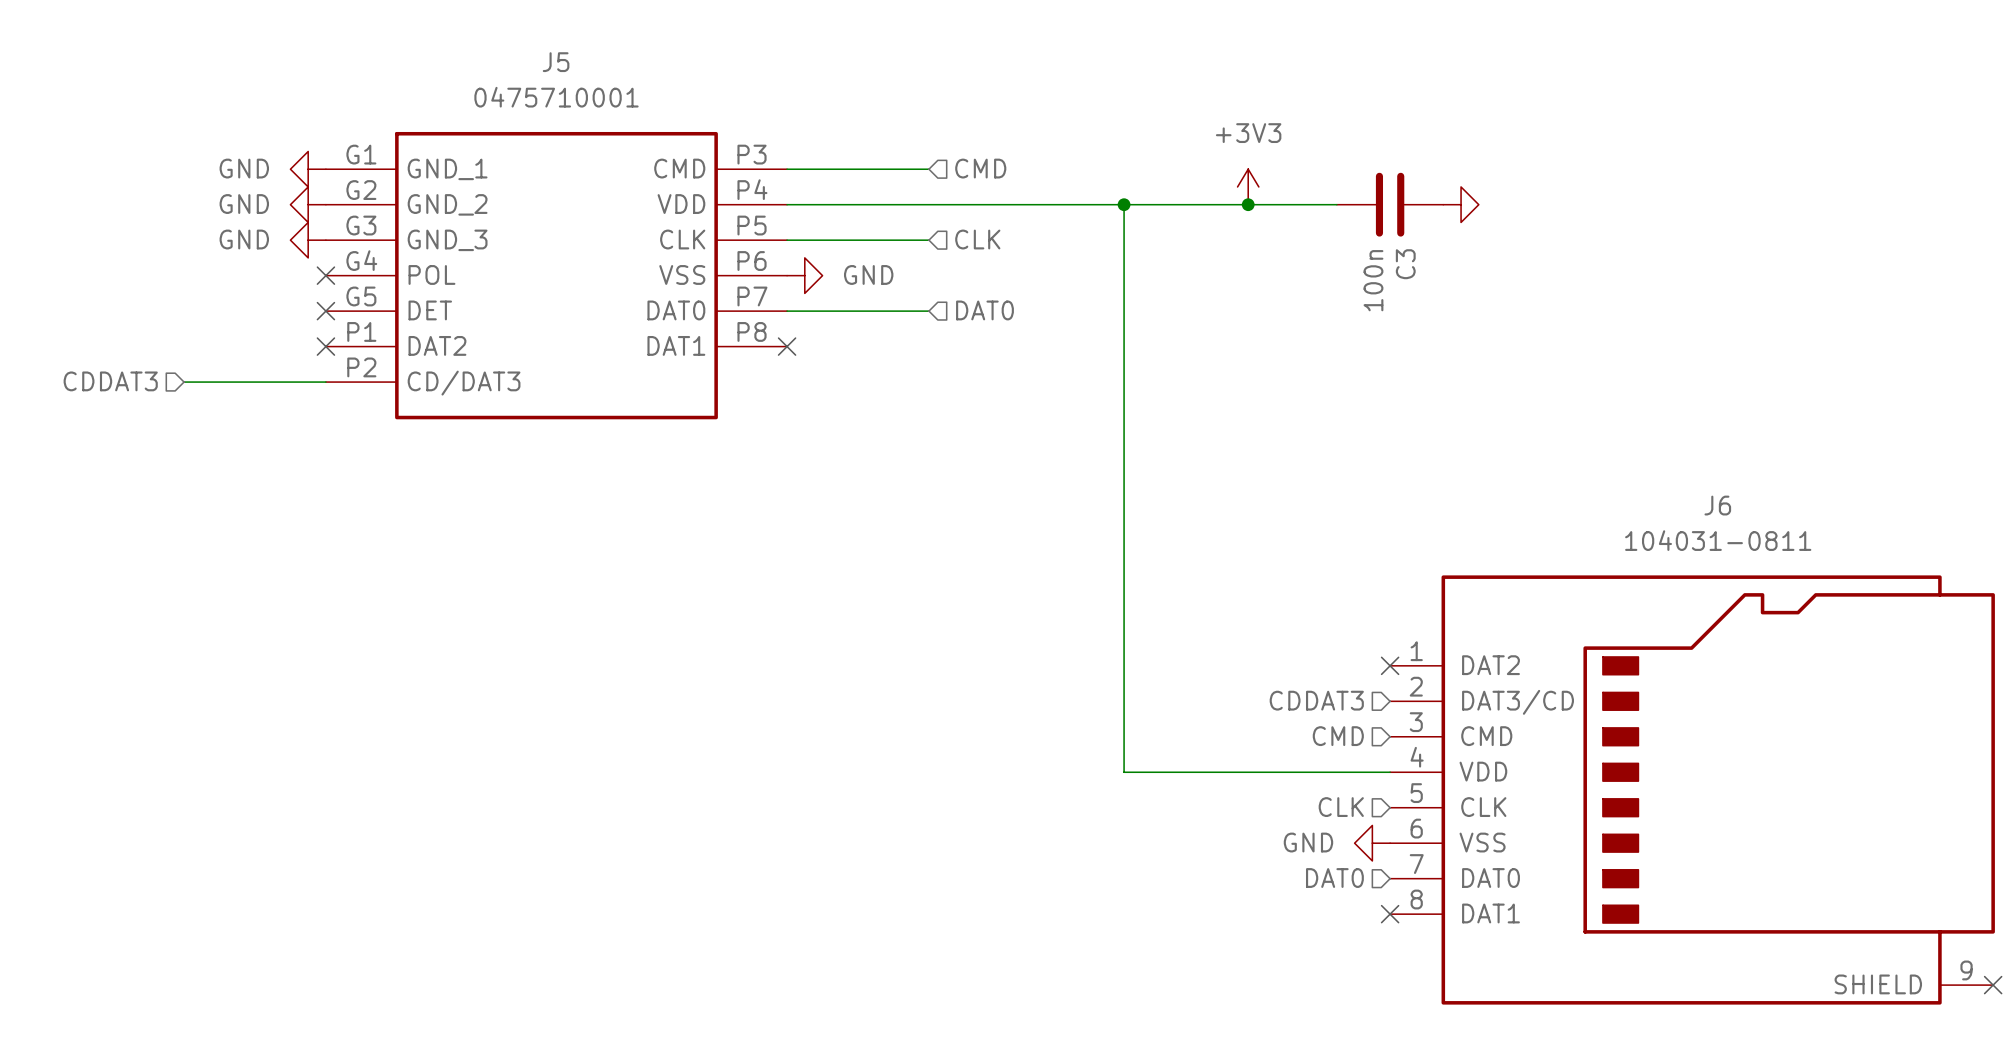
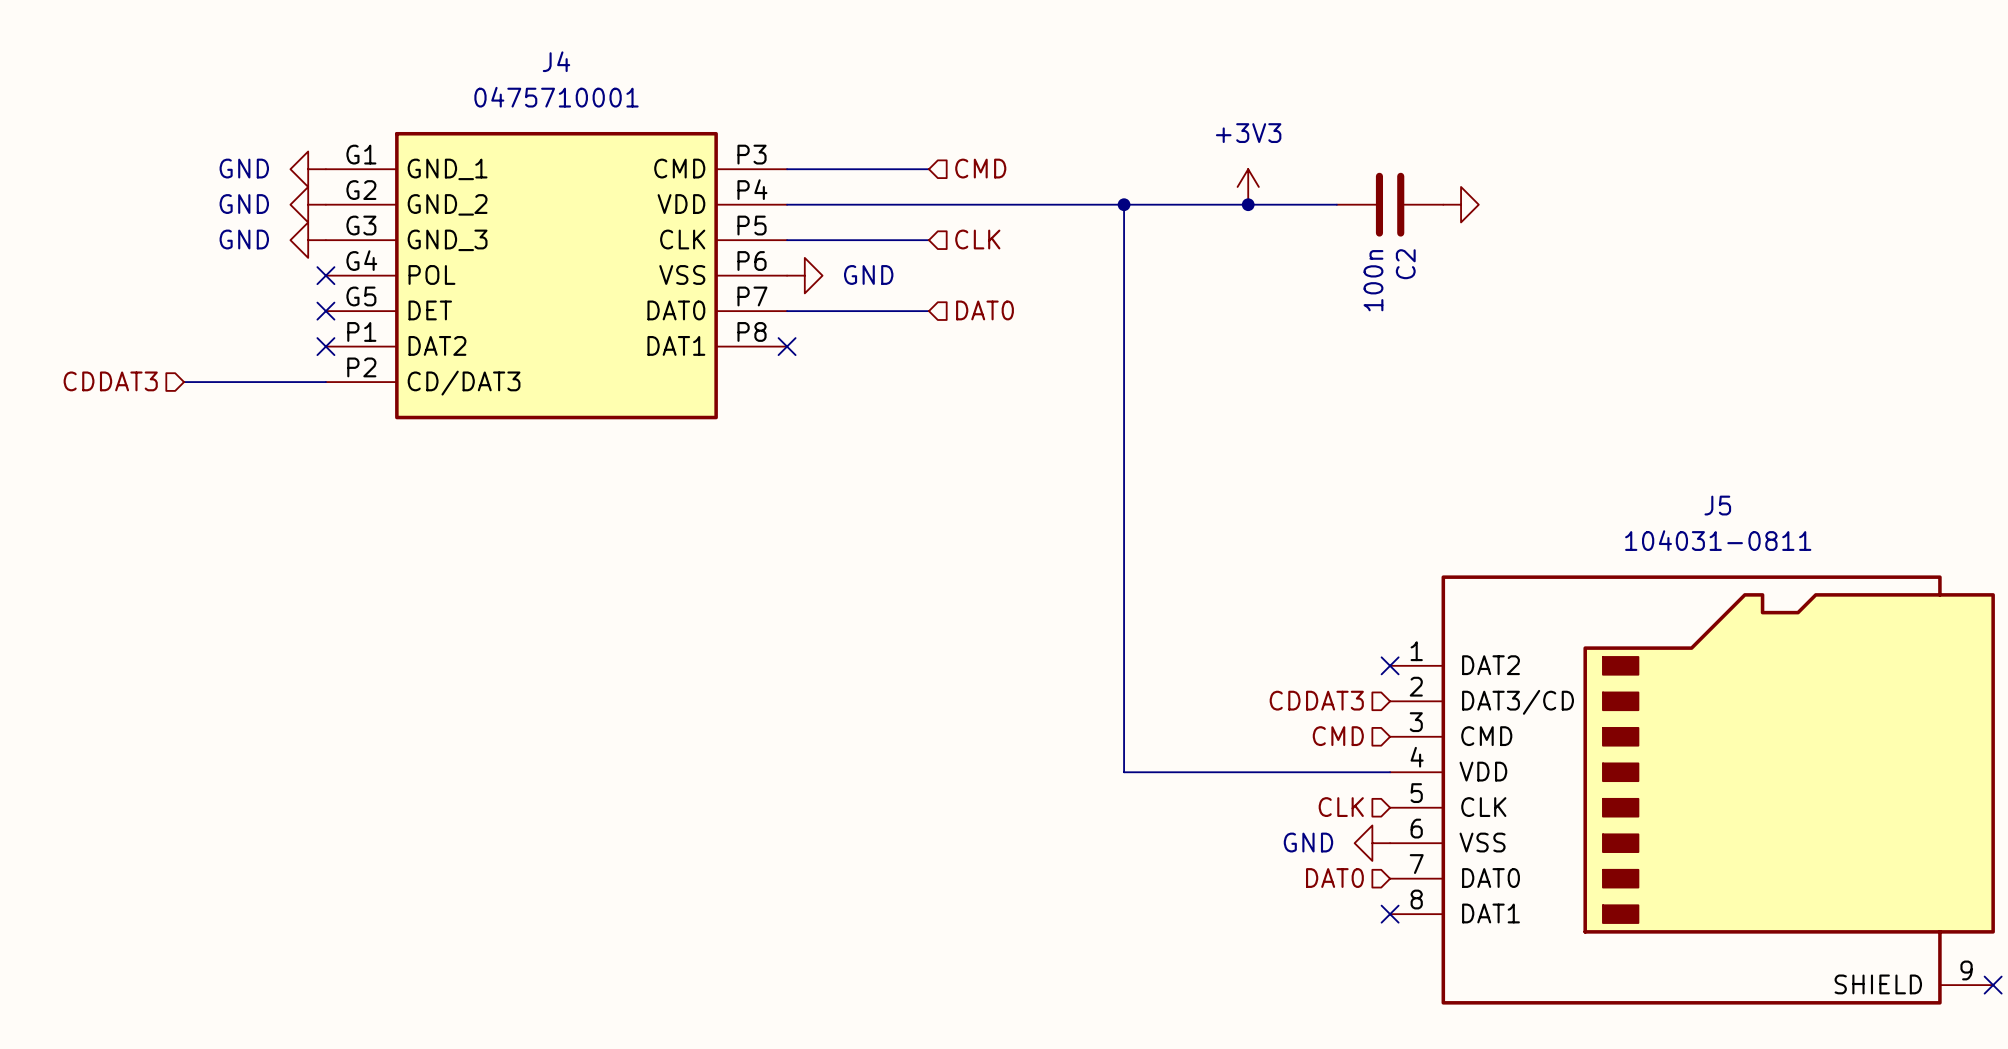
J5 name: J5 (556, 62) -> J4 (556, 61)
C3 name: C3 (1405, 264) -> C2 (1405, 264)
J6 name: J6 (1717, 505) -> J5 (1717, 505)

